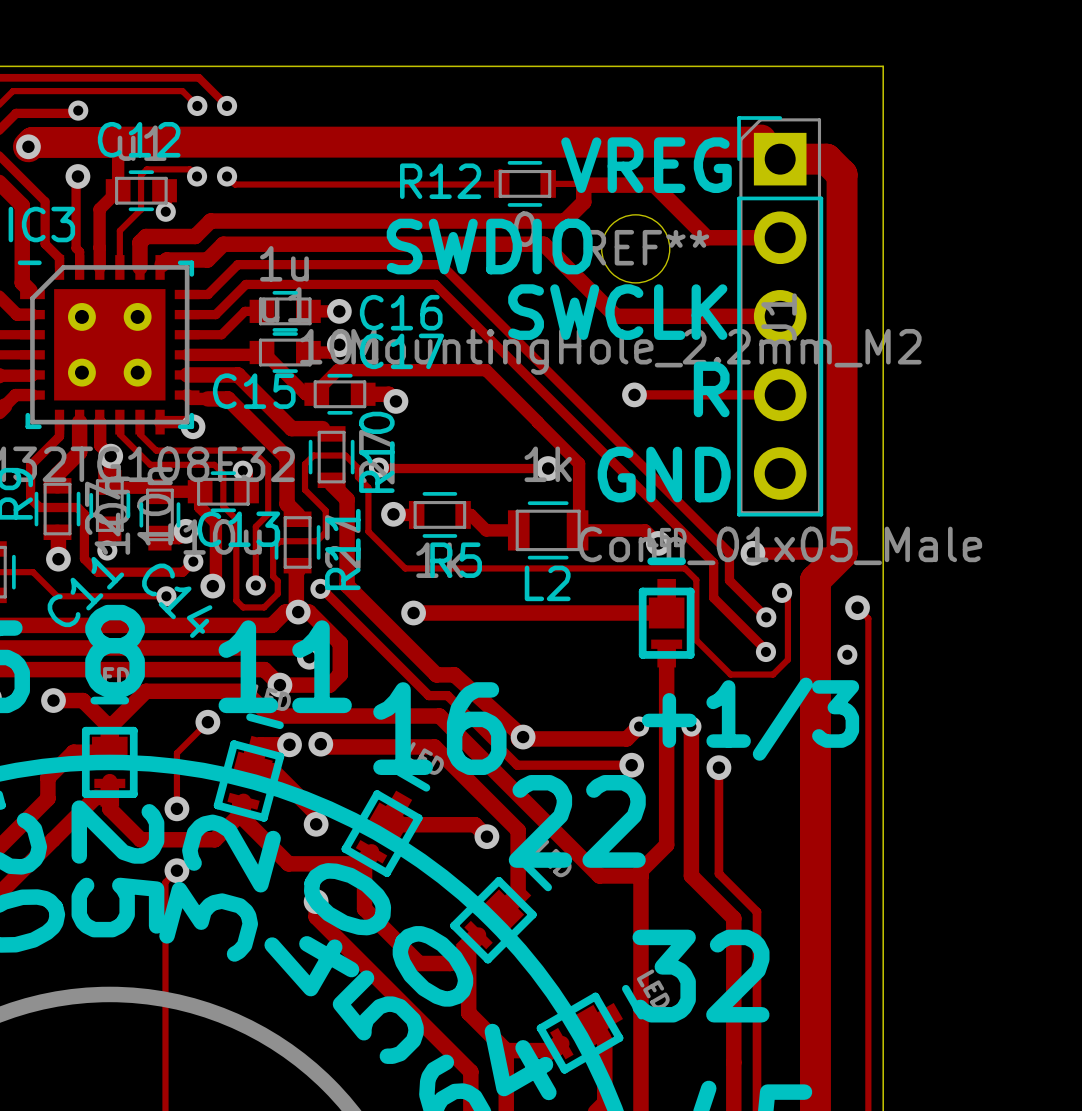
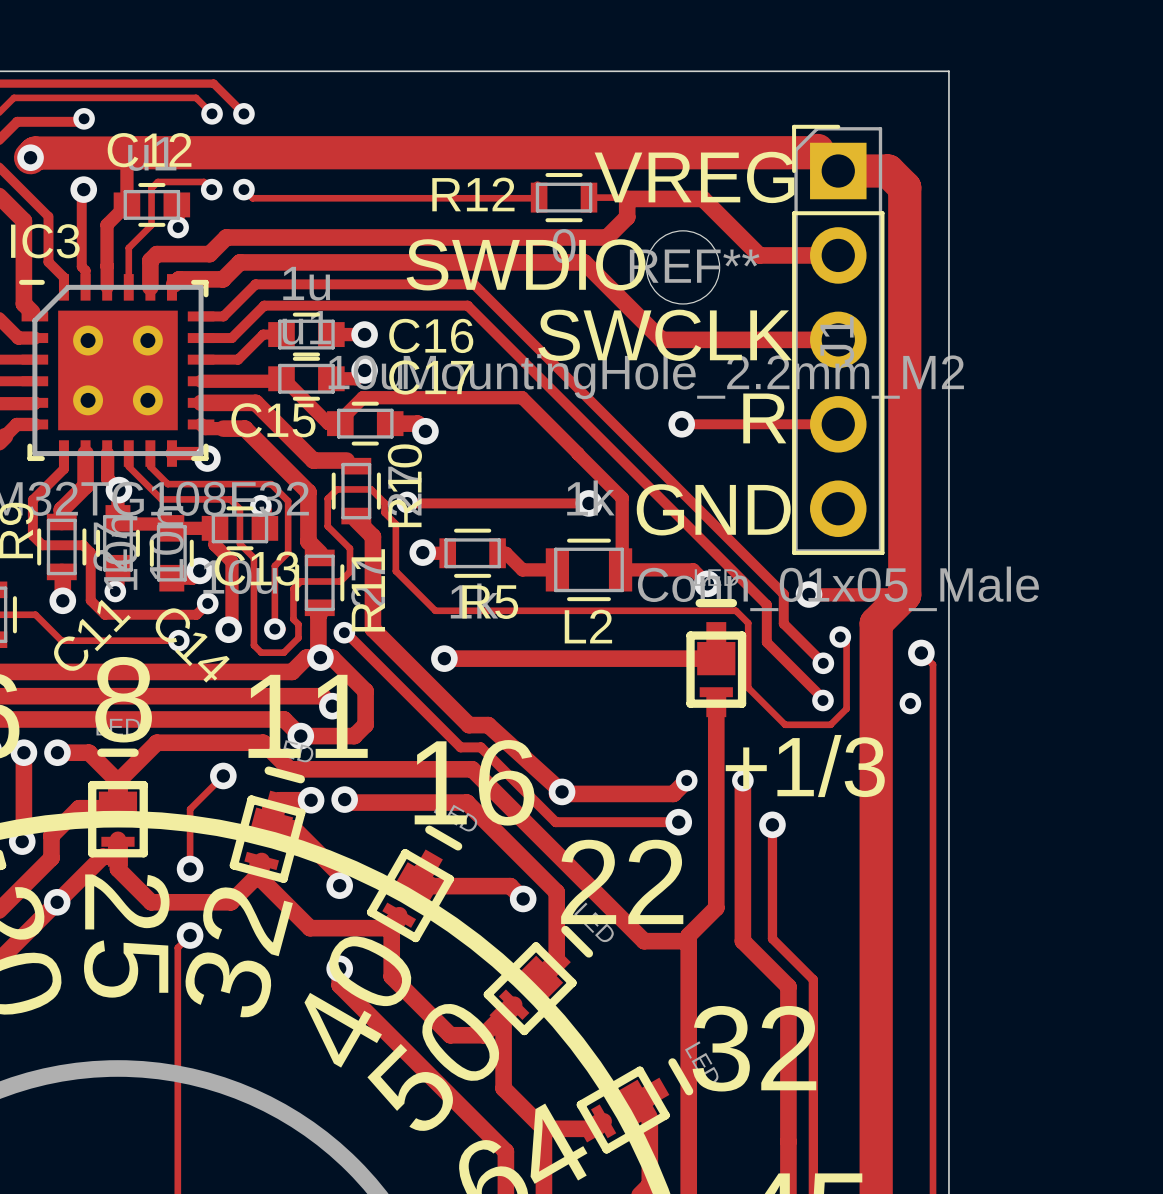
track: none -> (23, 752) (23, 839) (22, 841)
via: none -> (23, 752)
via: none -> (22, 841)
via: none -> (57, 902)

